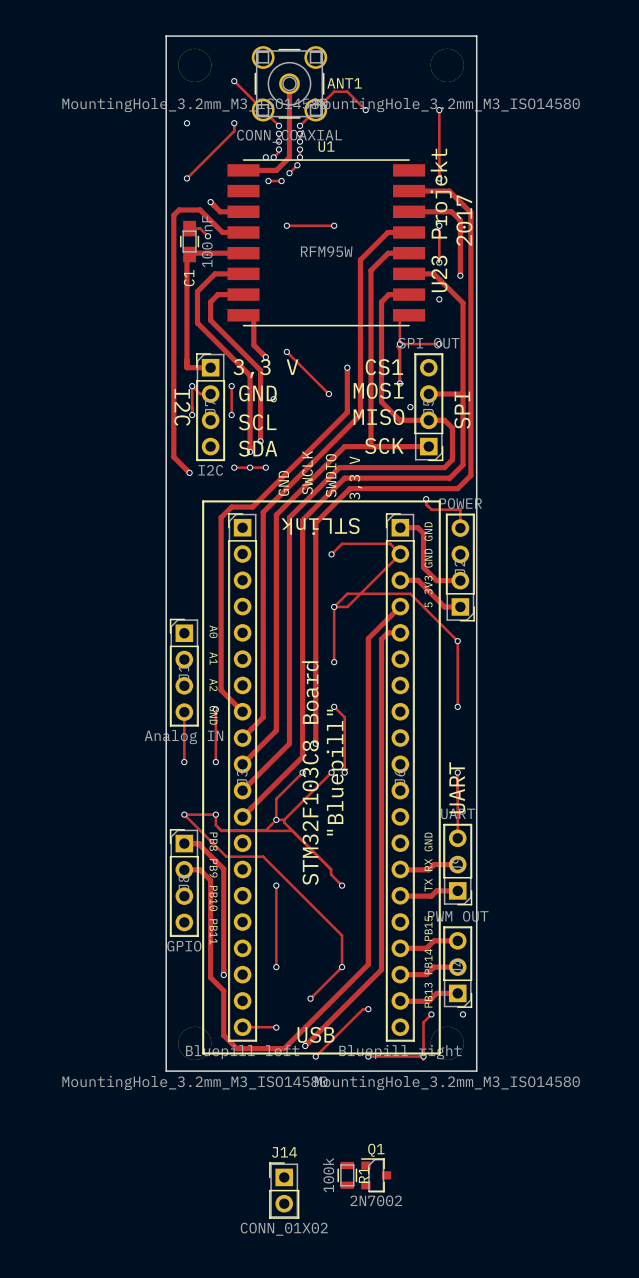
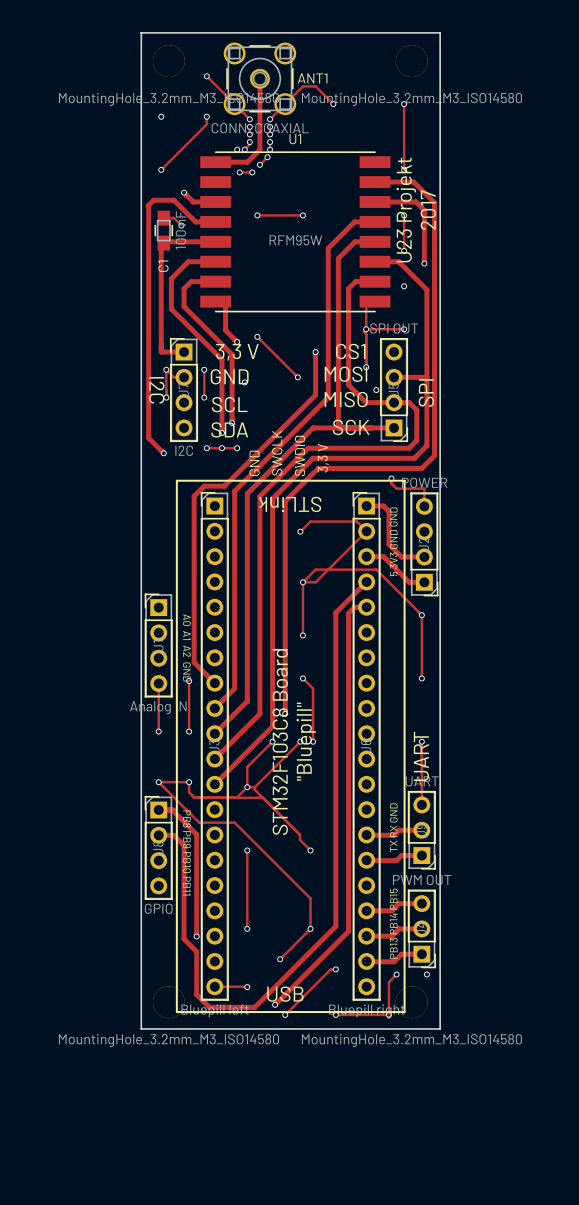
R1: 100k (347, 1175) -> none
Q1: 2N7002 (376, 1175) -> none
J14: CONN_01X02 (284, 1190) -> none

